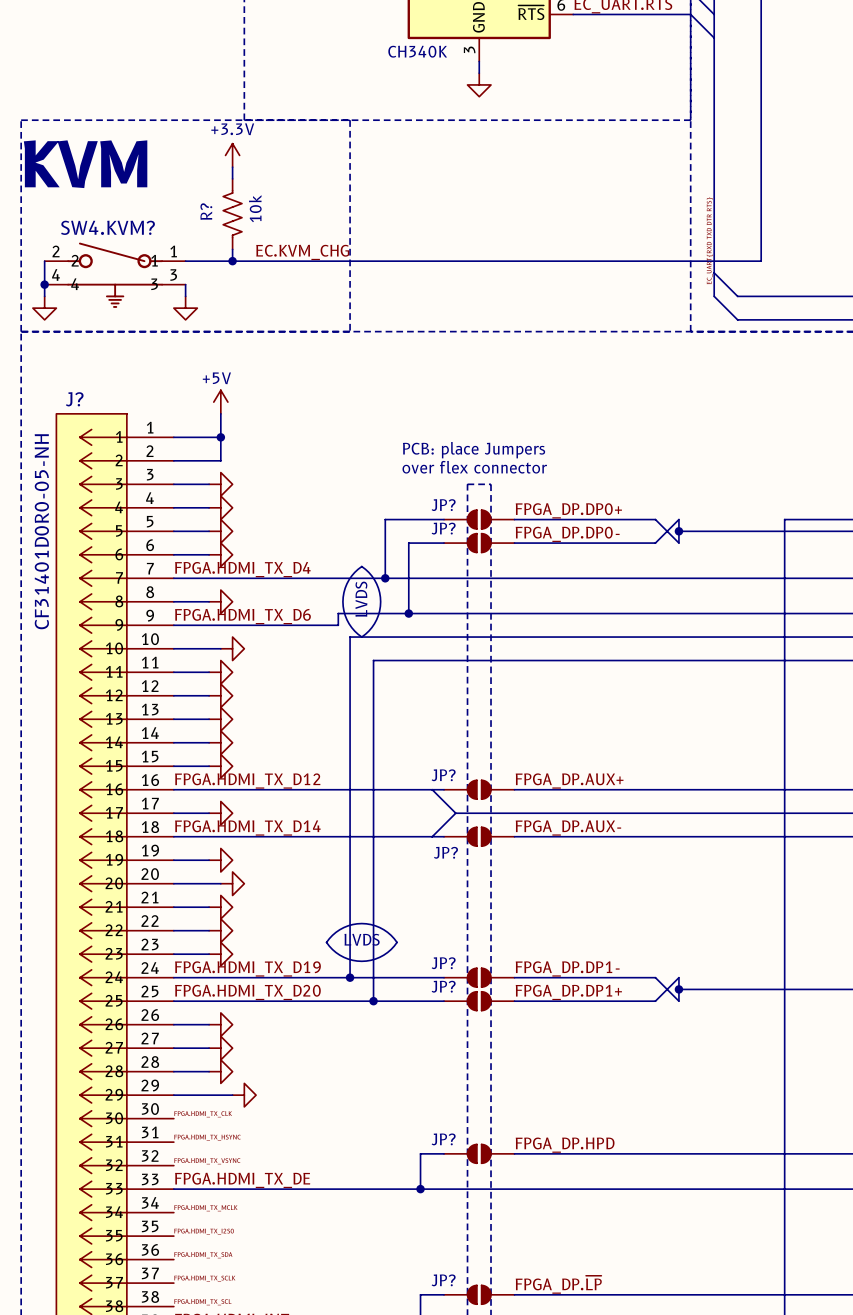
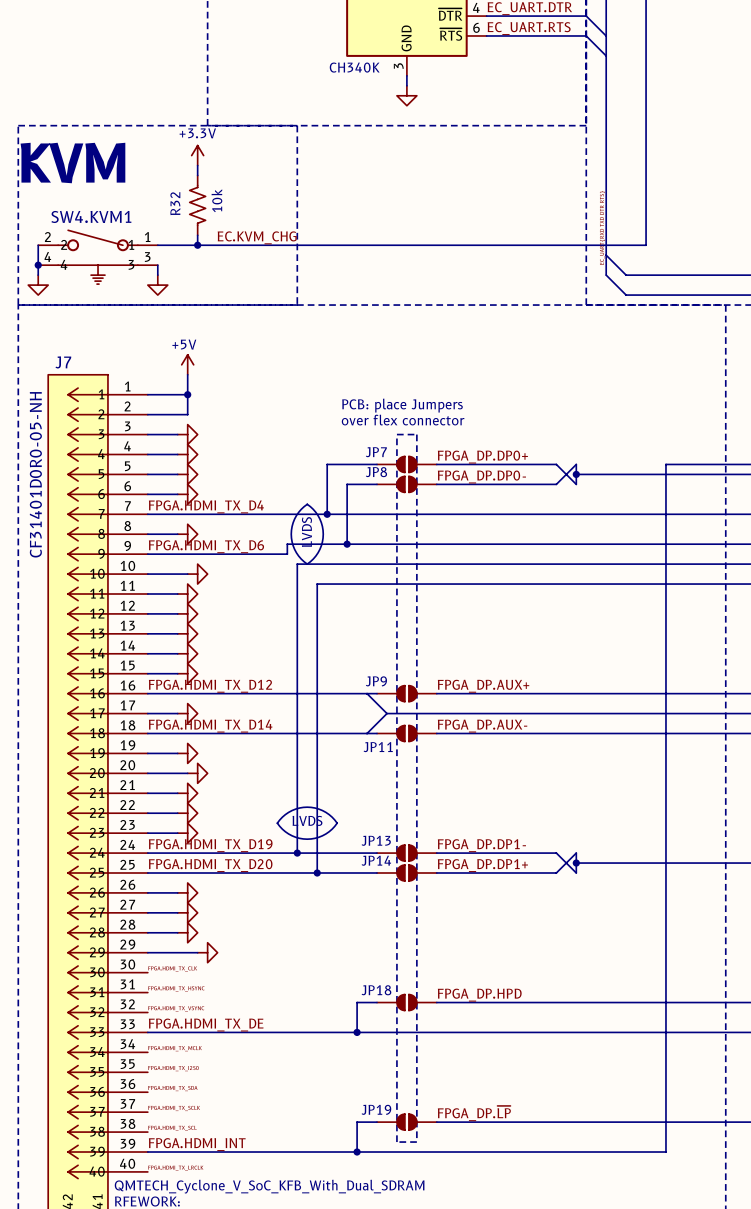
R? name: R? (206, 211) -> R32 (175, 203)
SW4.KVM? name: SW4.KVM? (107, 227) -> SW4.KVM1 (91, 216)
J? name: J? (74, 399) -> J7 (63, 362)
JP? name: JP? (443, 505) -> JP7 (376, 452)
JP? name: JP? (443, 528) -> JP8 (376, 472)
JP? name: JP? (443, 775) -> JP9 (376, 681)
JP? name: JP? (445, 852) -> JP11 (378, 747)
JP? name: JP? (443, 963) -> JP13 (376, 840)
JP? name: JP? (443, 986) -> JP14 (376, 860)
JP? name: JP? (443, 1139) -> JP18 (376, 990)
JP? name: JP? (443, 1280) -> JP19 (376, 1109)

